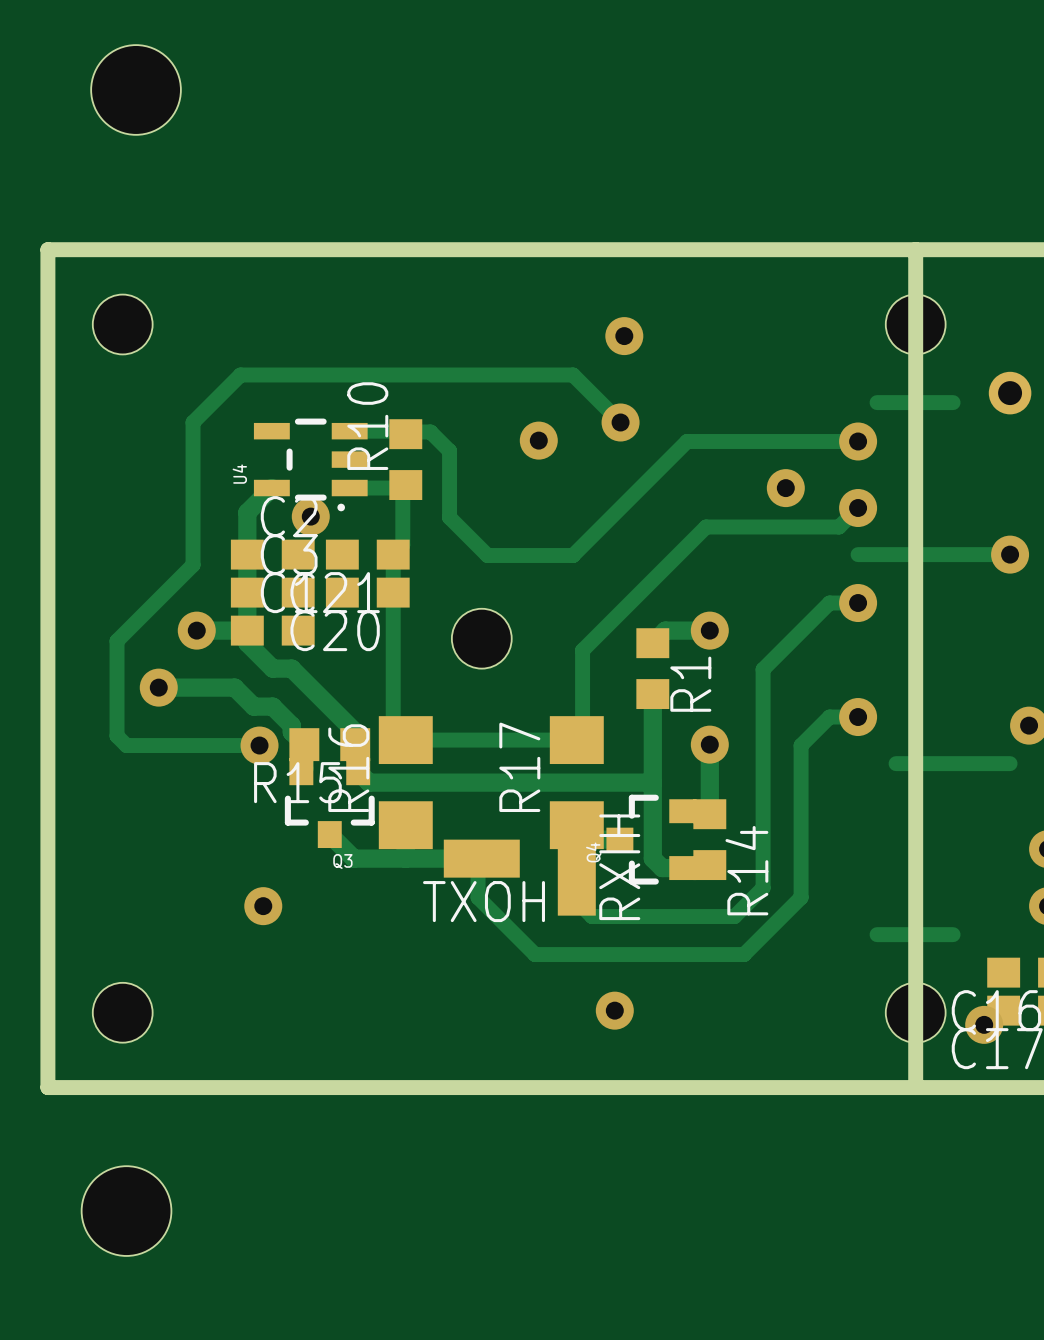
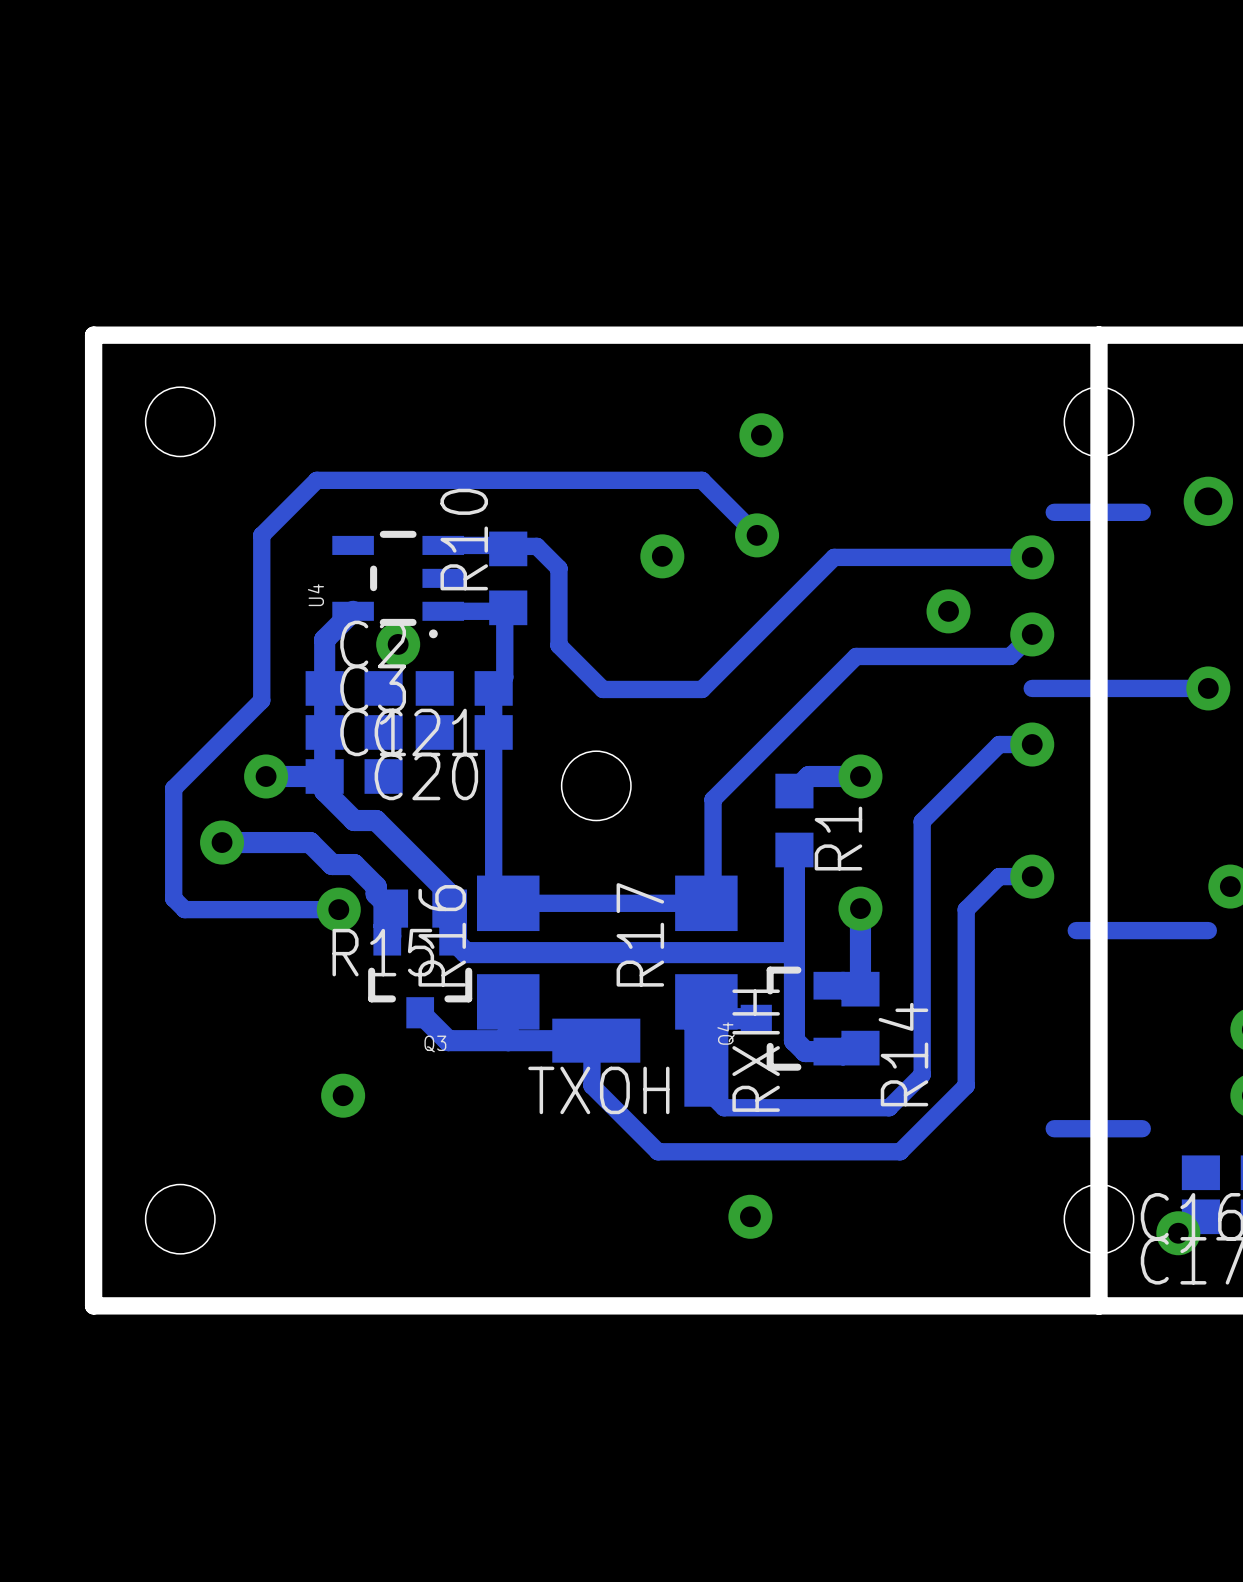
hole: (136, 89) -> none
hole: (126, 1211) -> none

